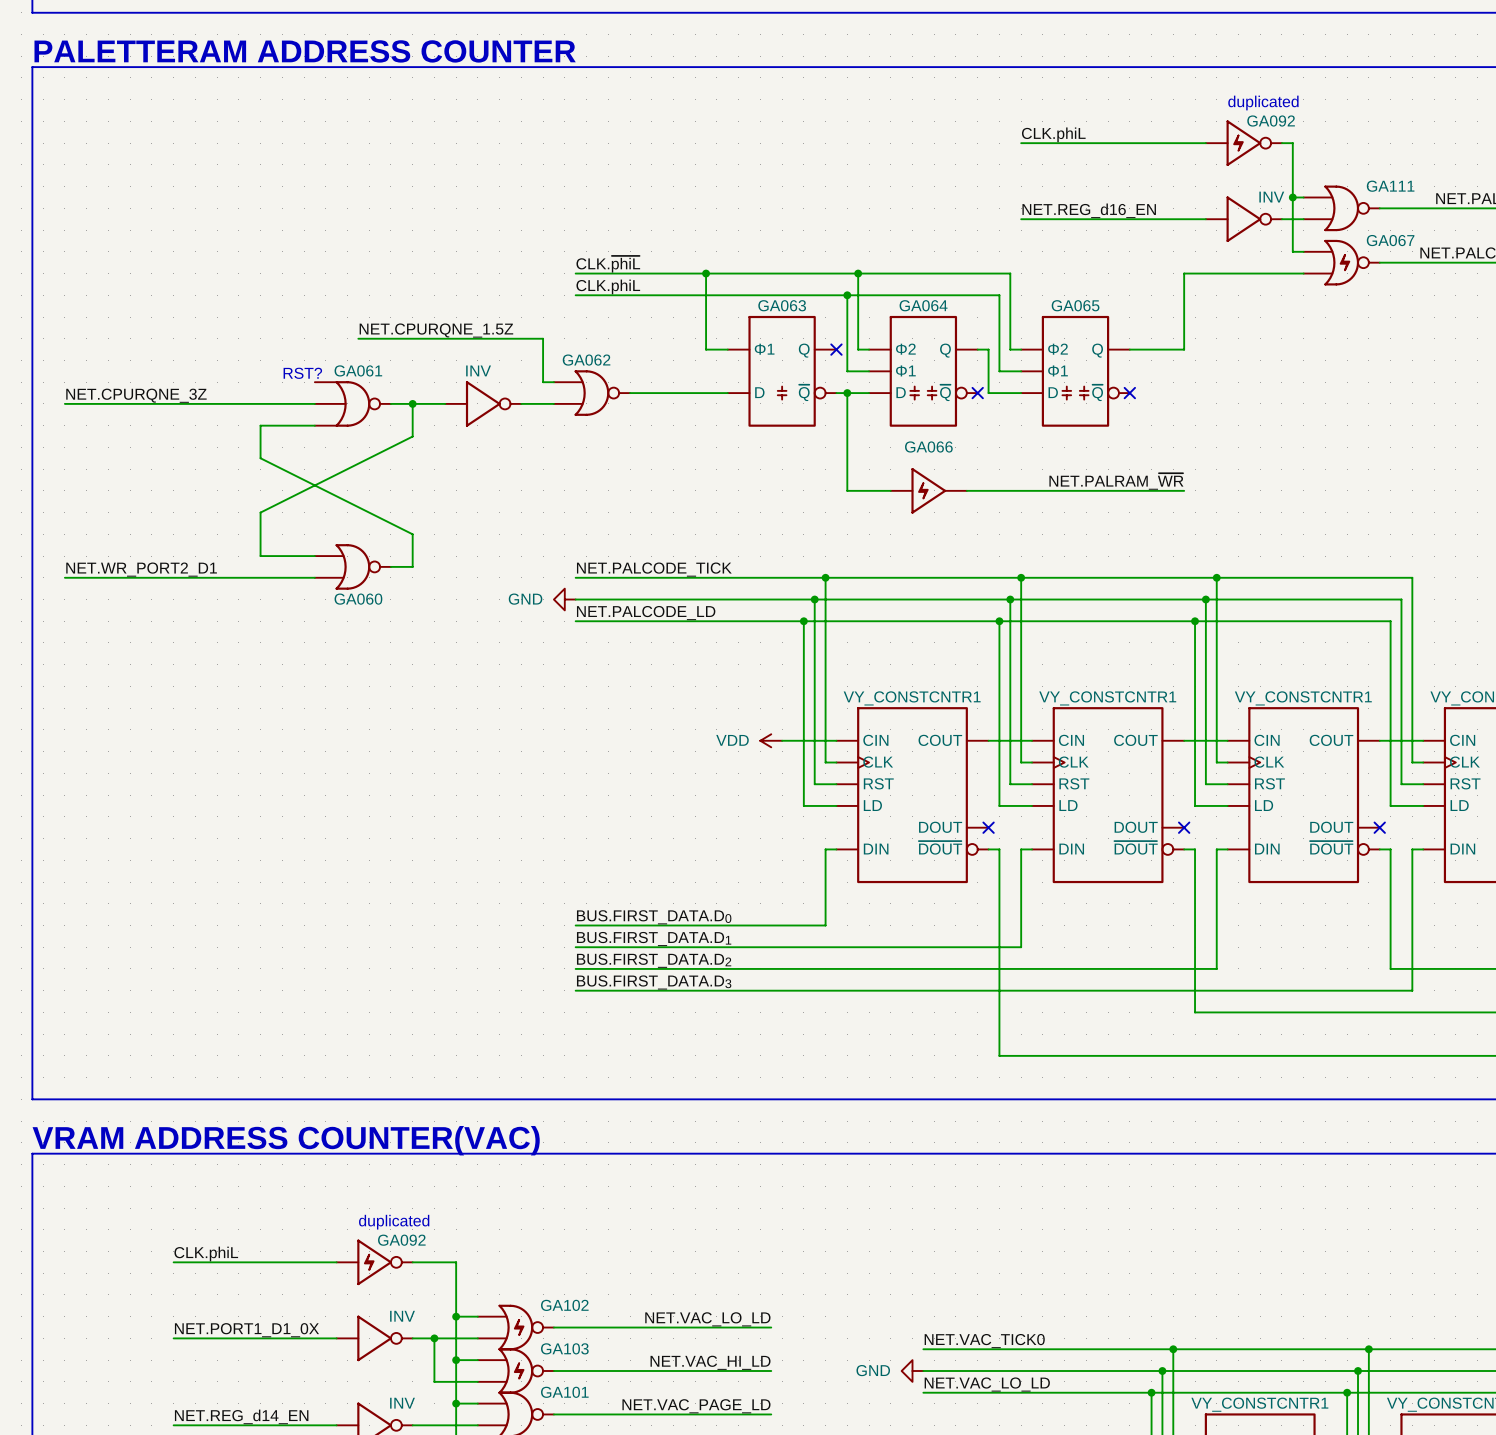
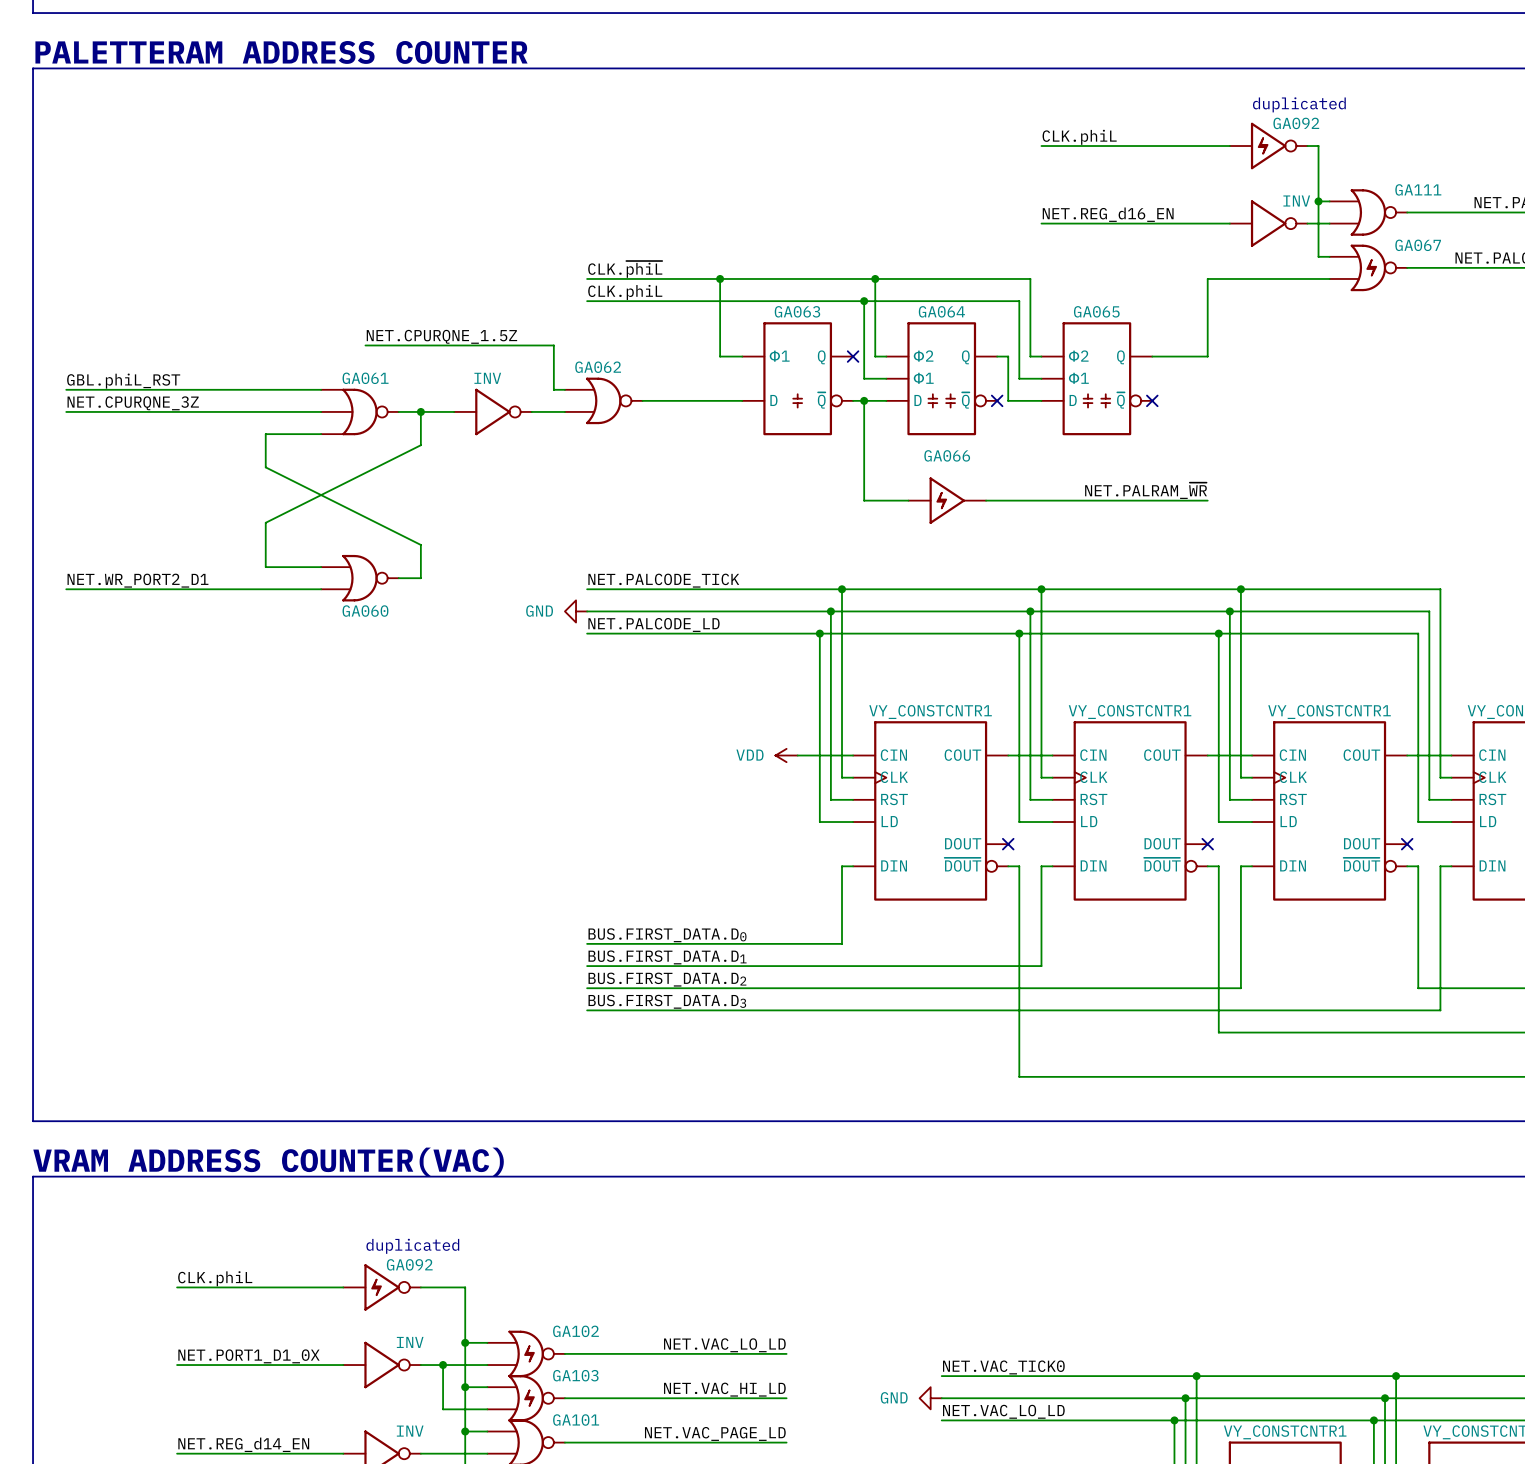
label: none -> GBL.phiL_RST (123, 381)
text: RST? (302, 373) -> none
wire: none -> (66, 389) (321, 389)

